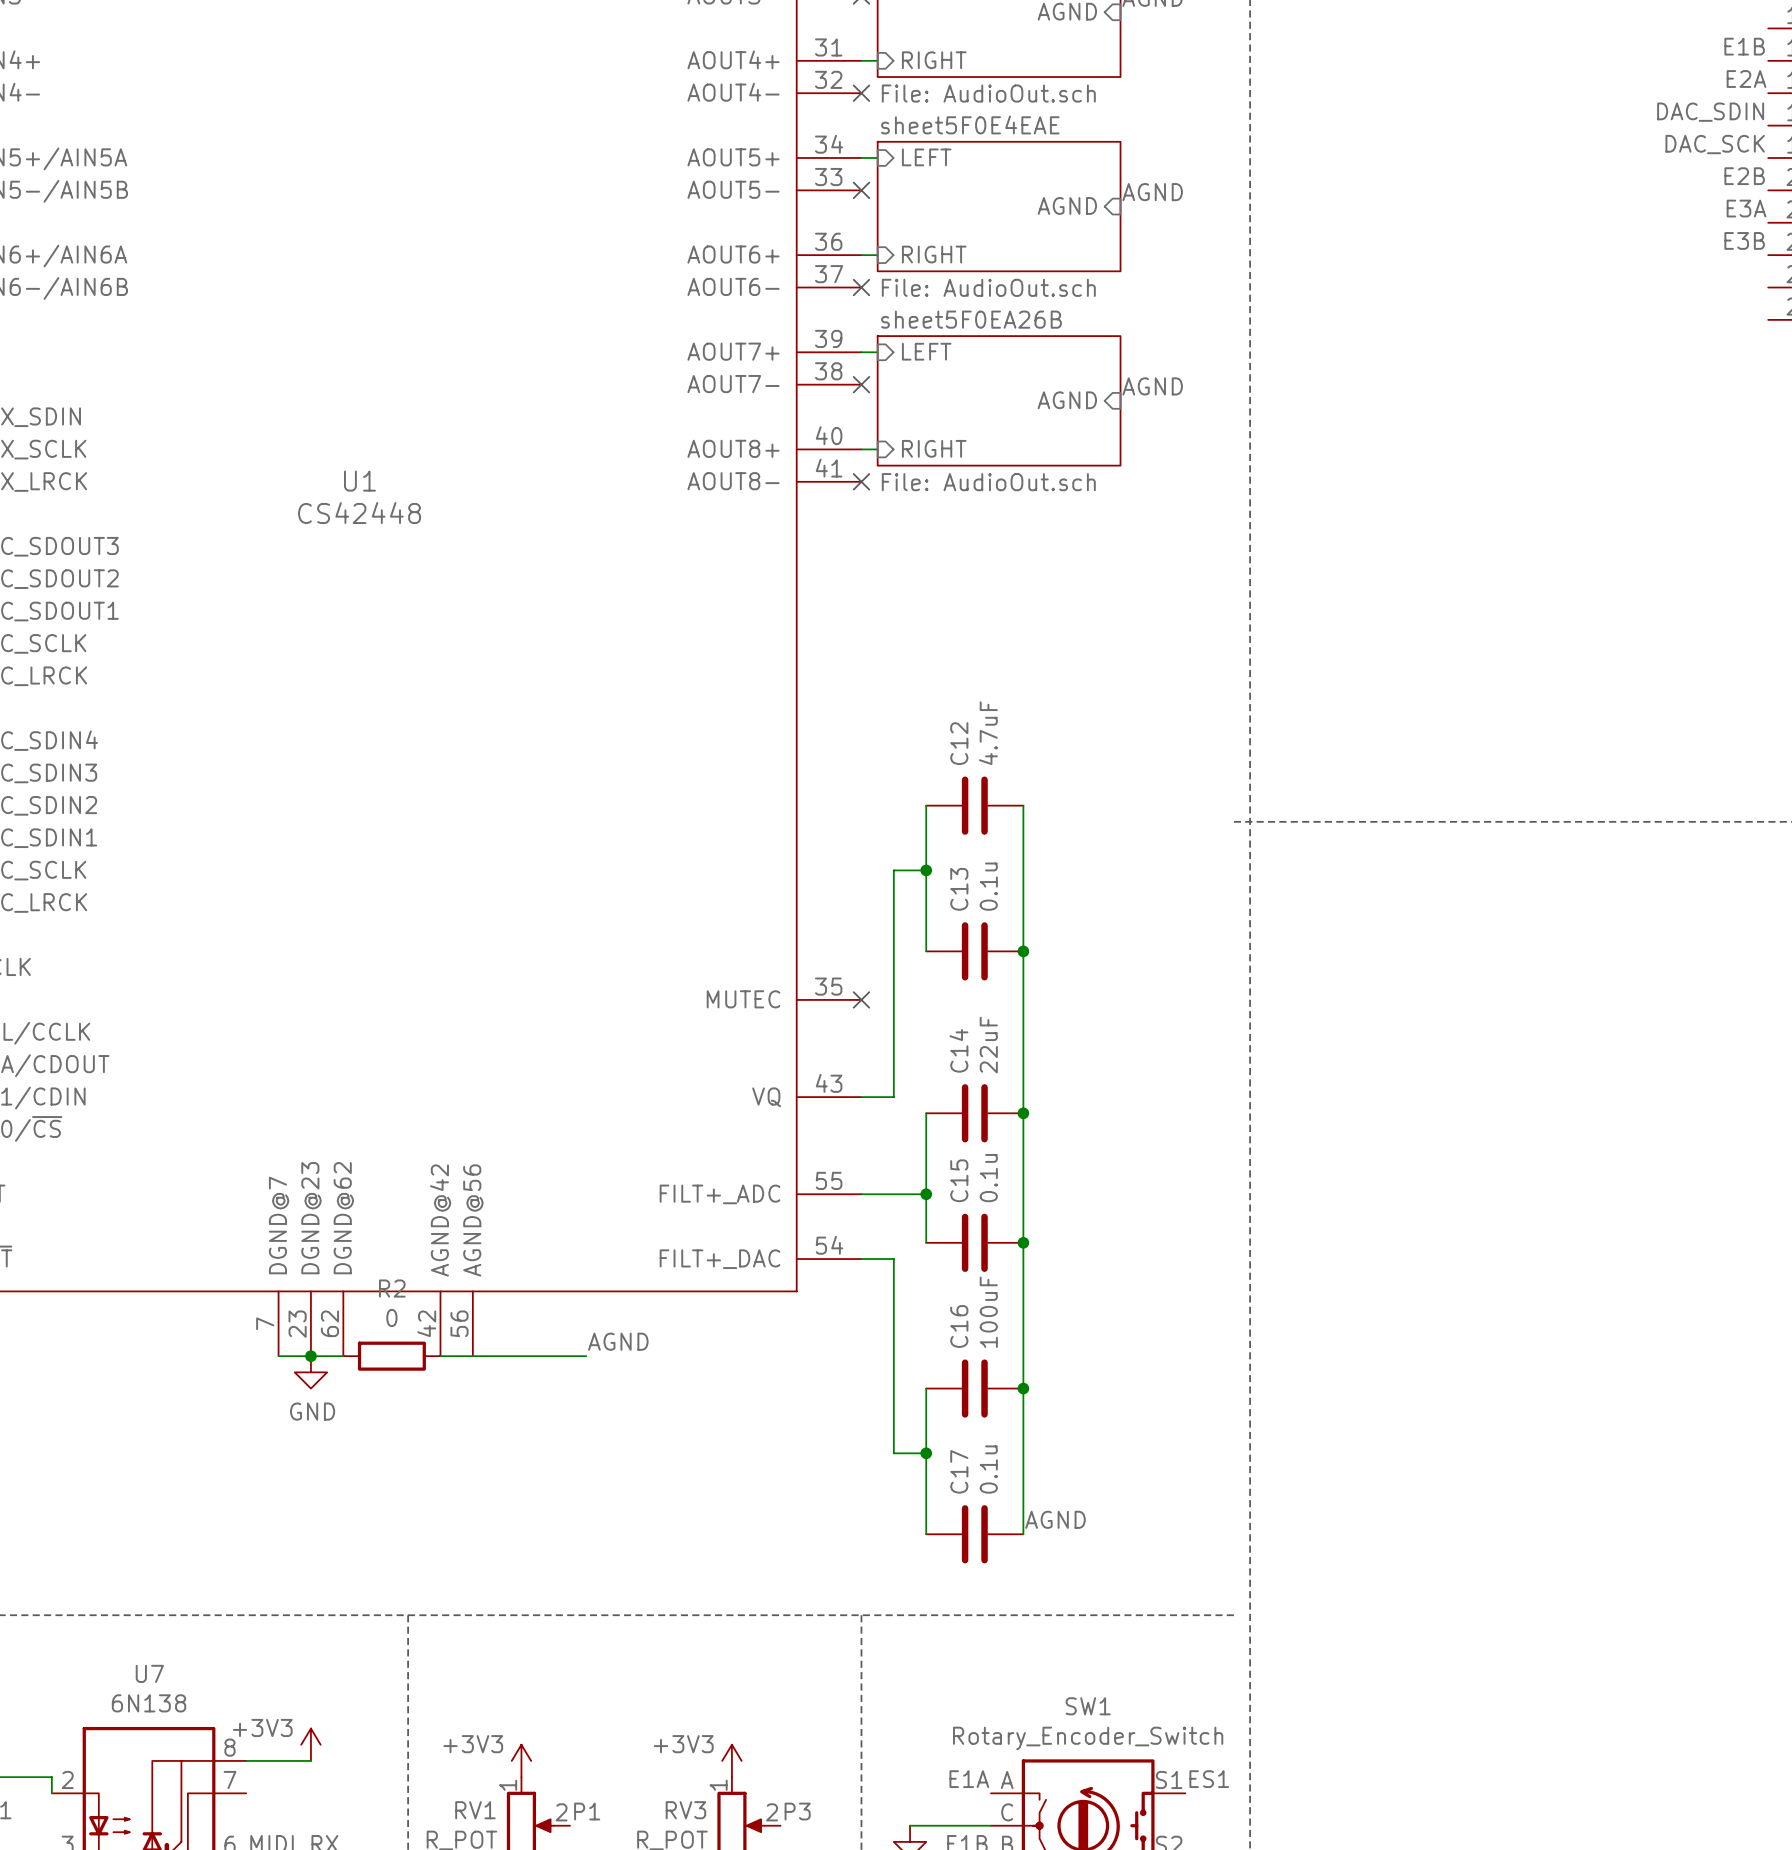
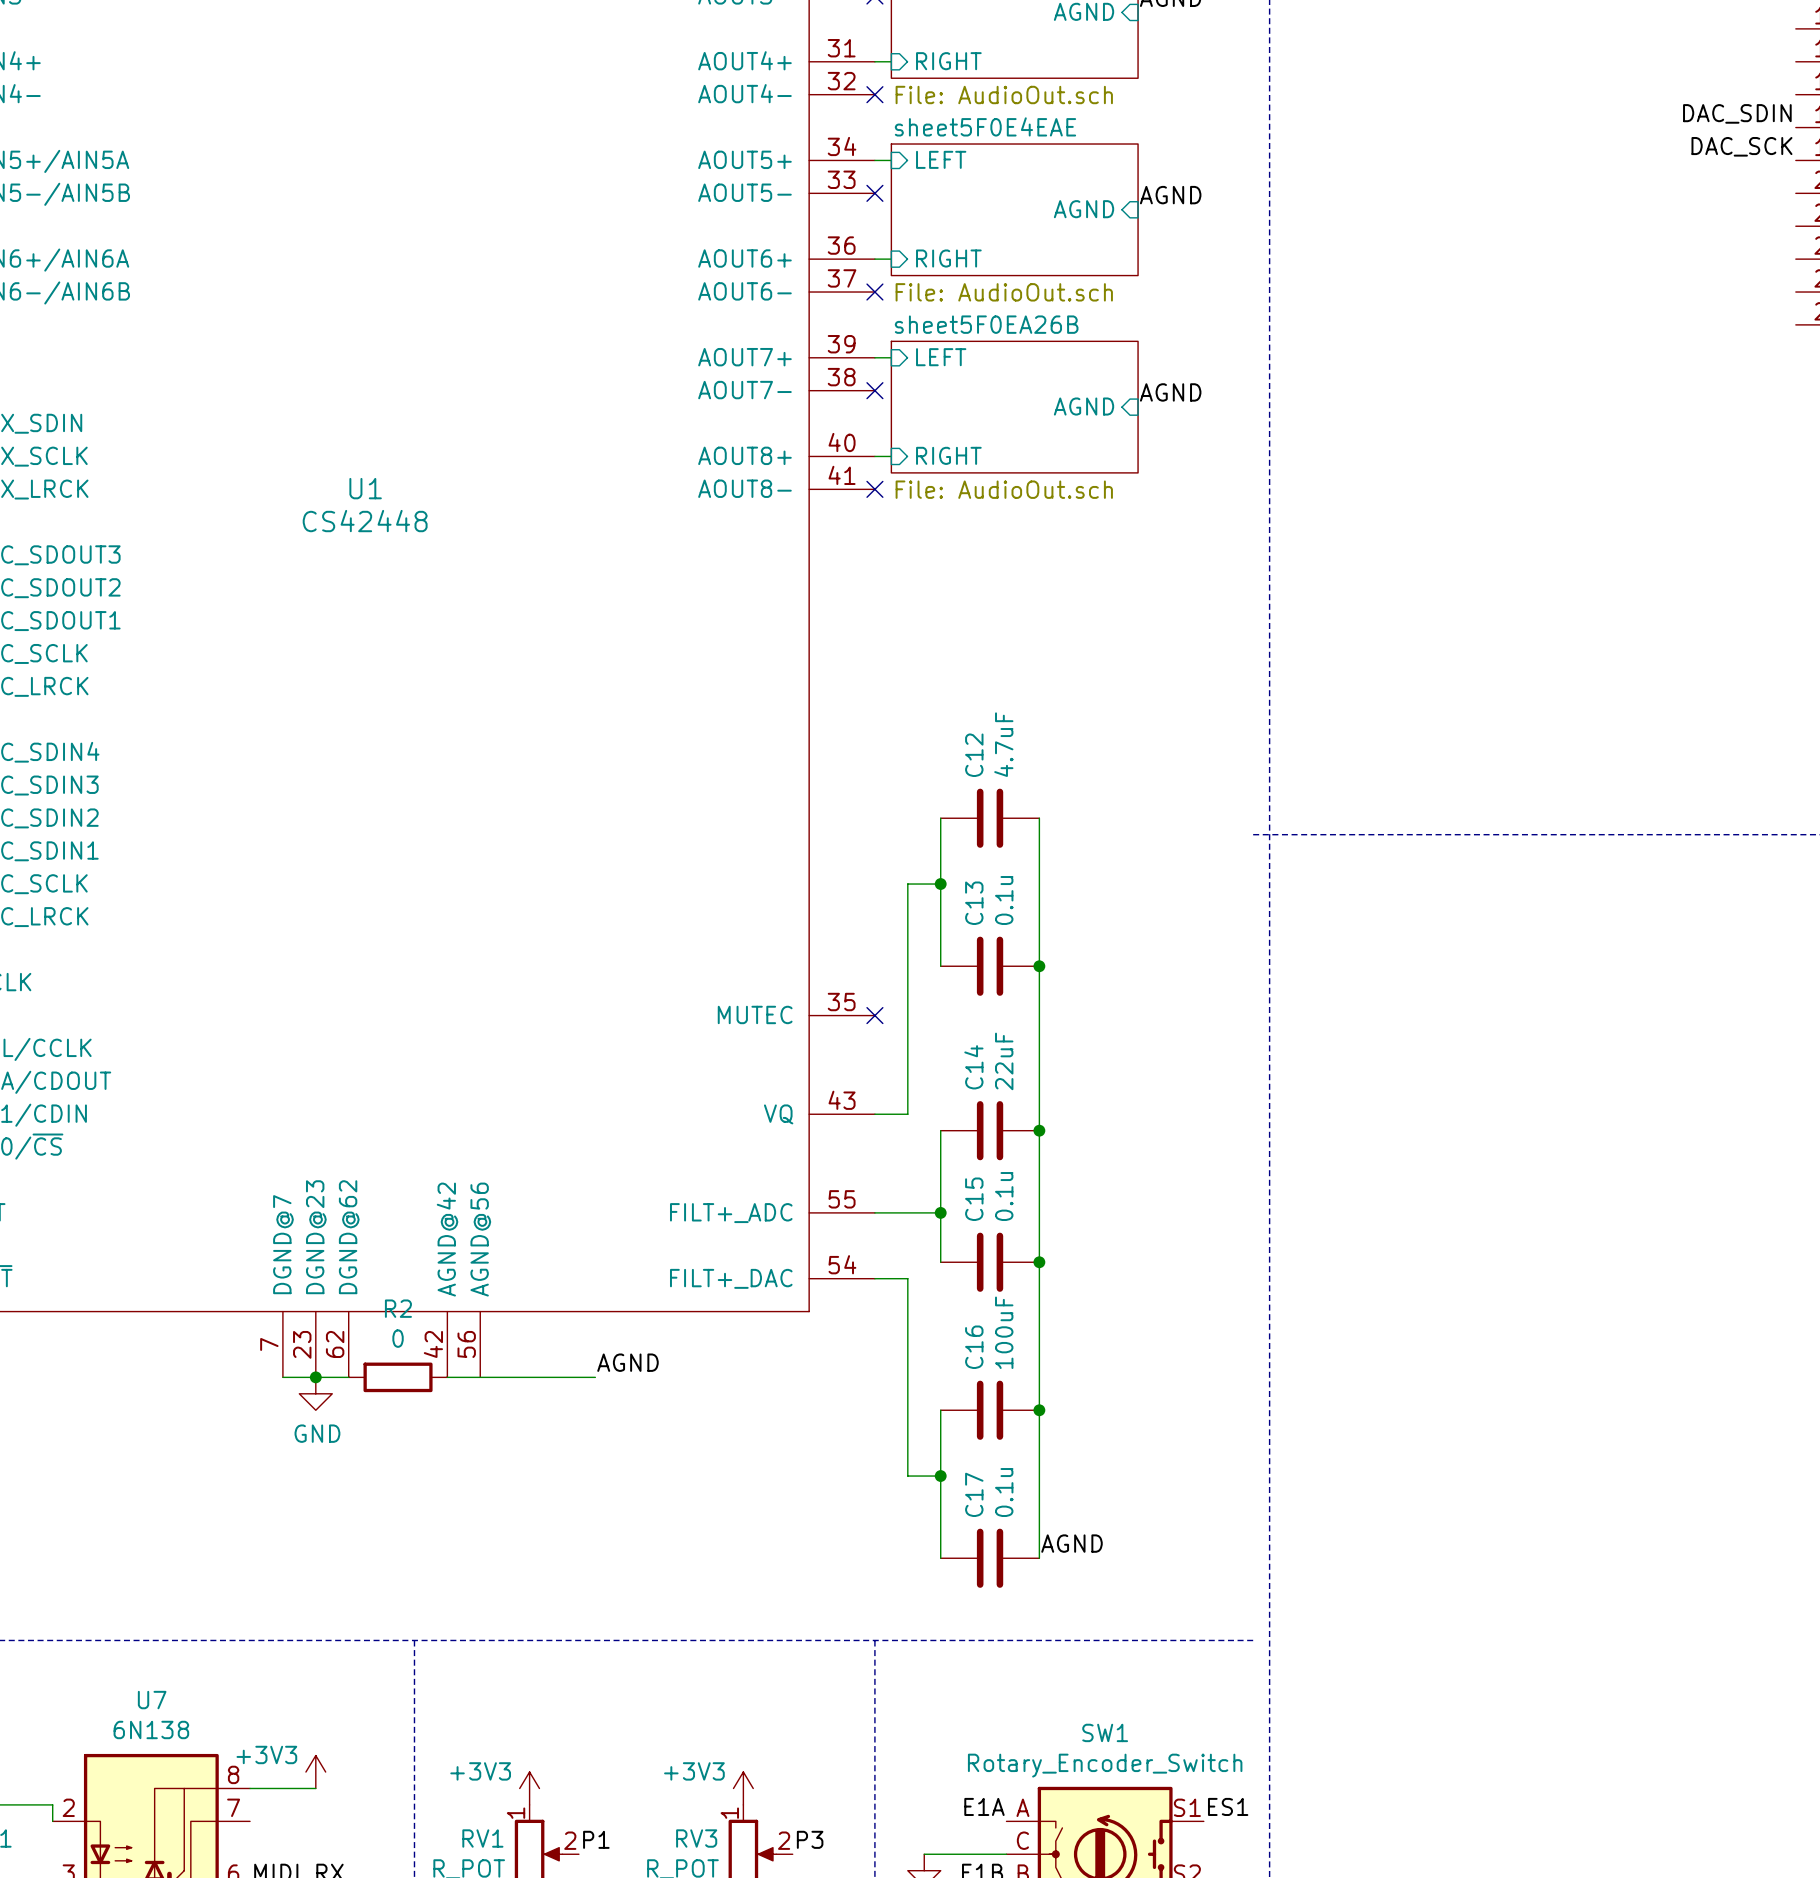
label: E1B (1744, 46) -> none
label: E2A (1746, 79) -> none
label: E2B (1744, 176) -> none
label: E3A (1746, 208) -> none
label: E3B (1744, 240) -> none

